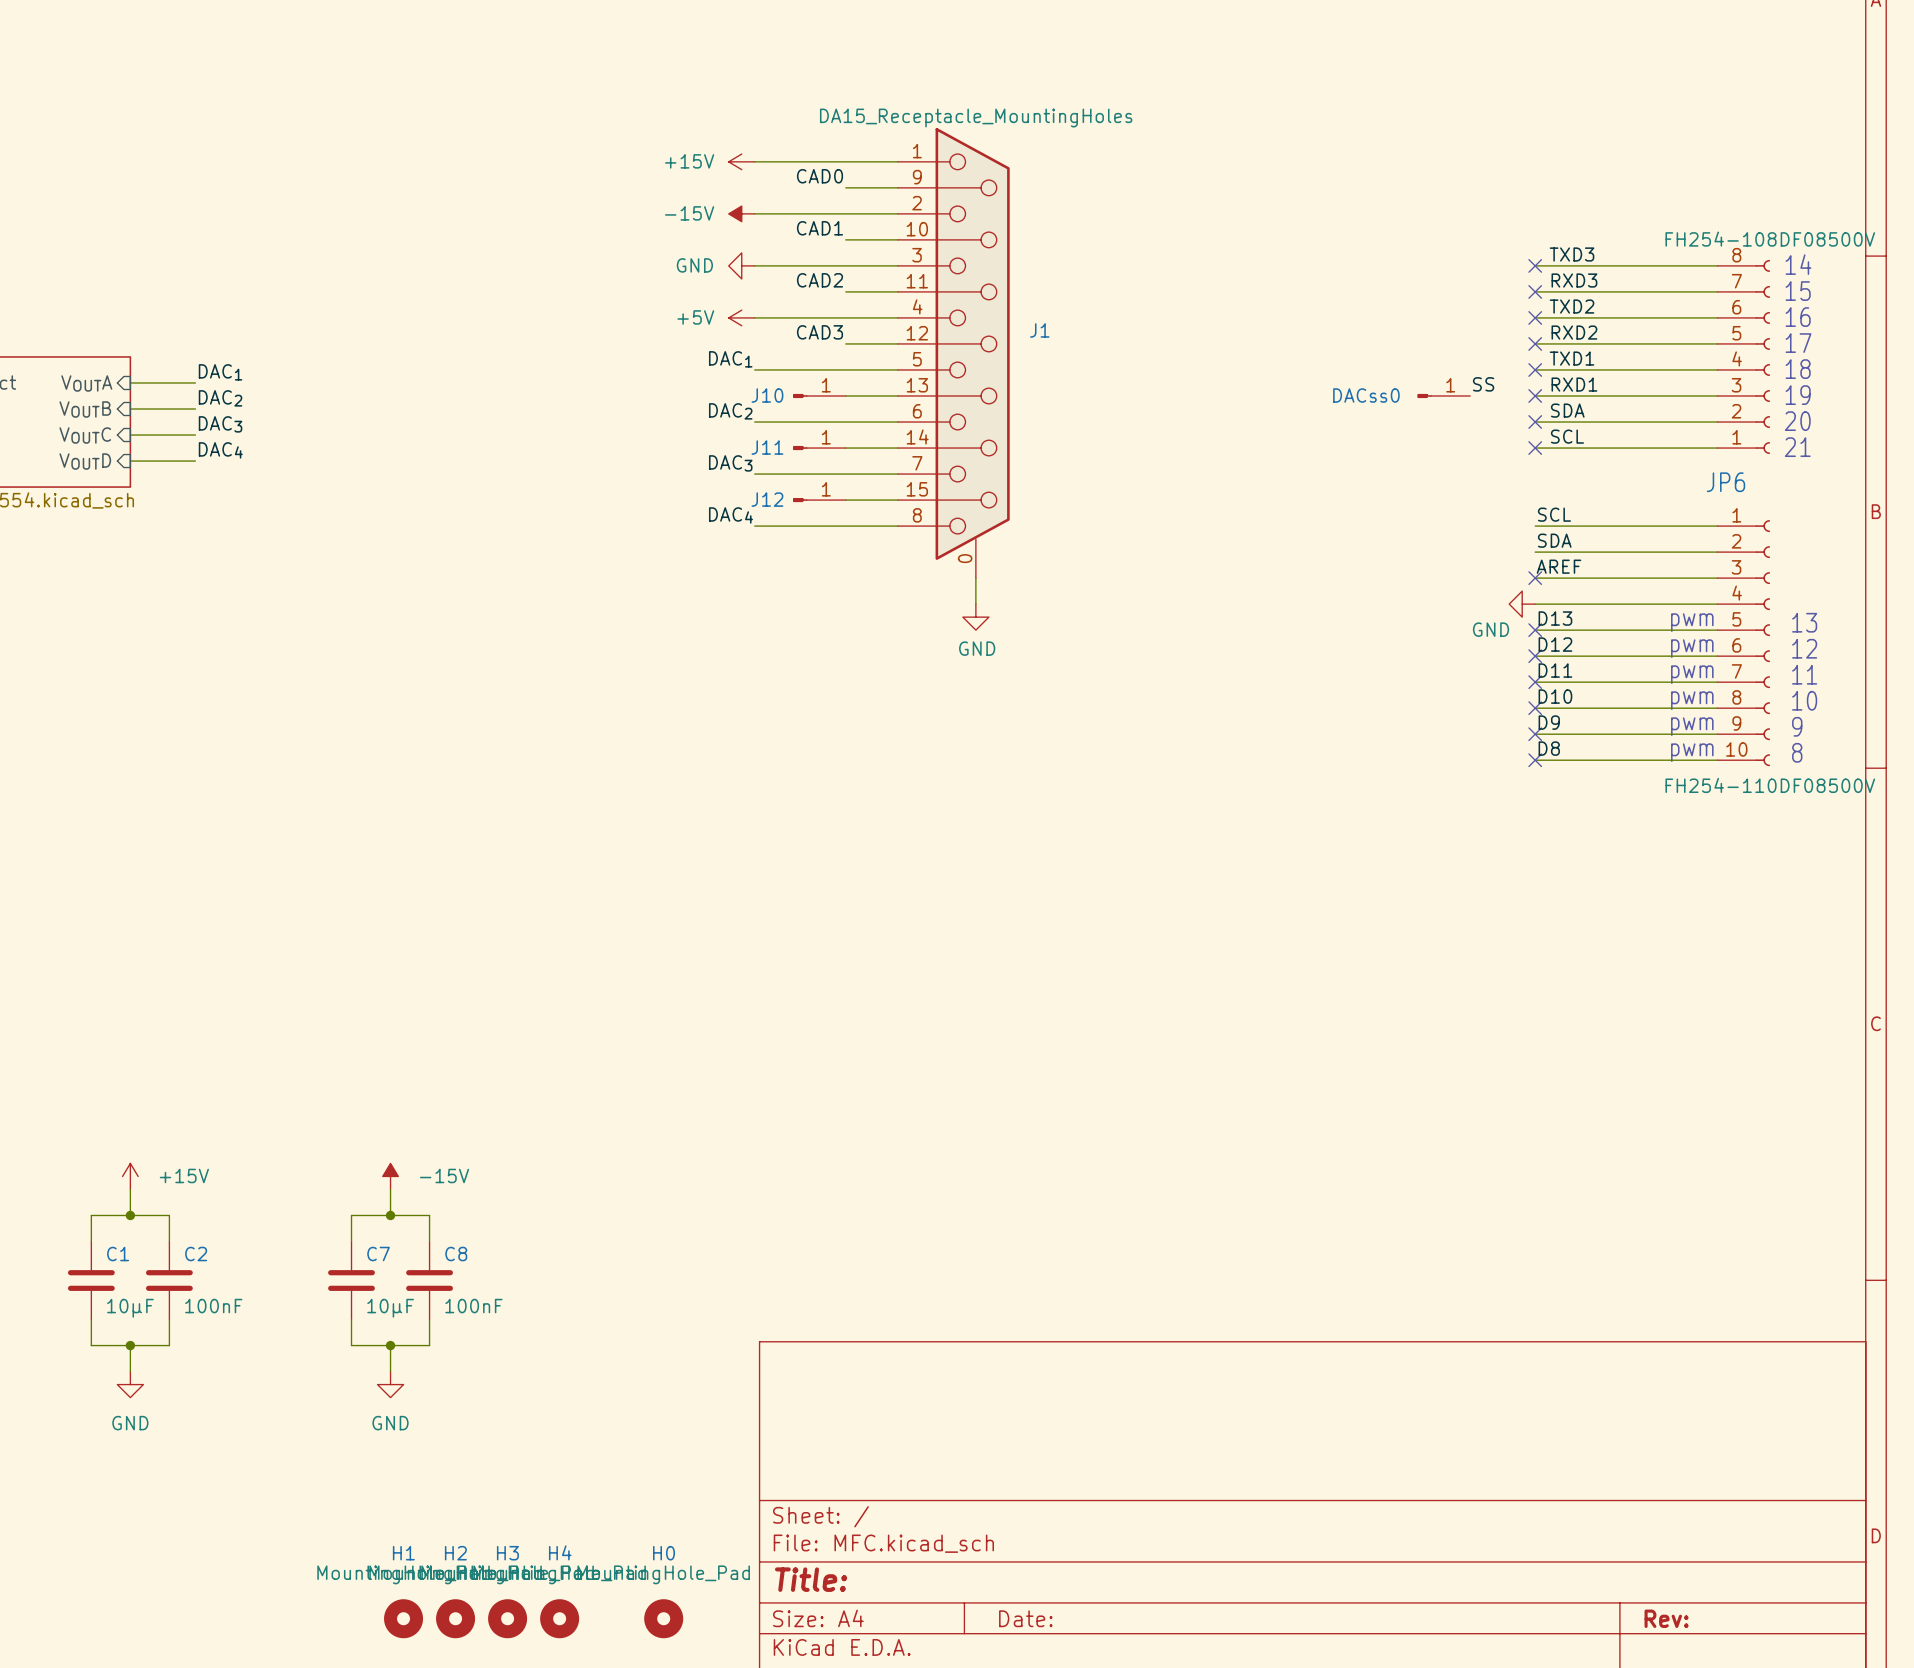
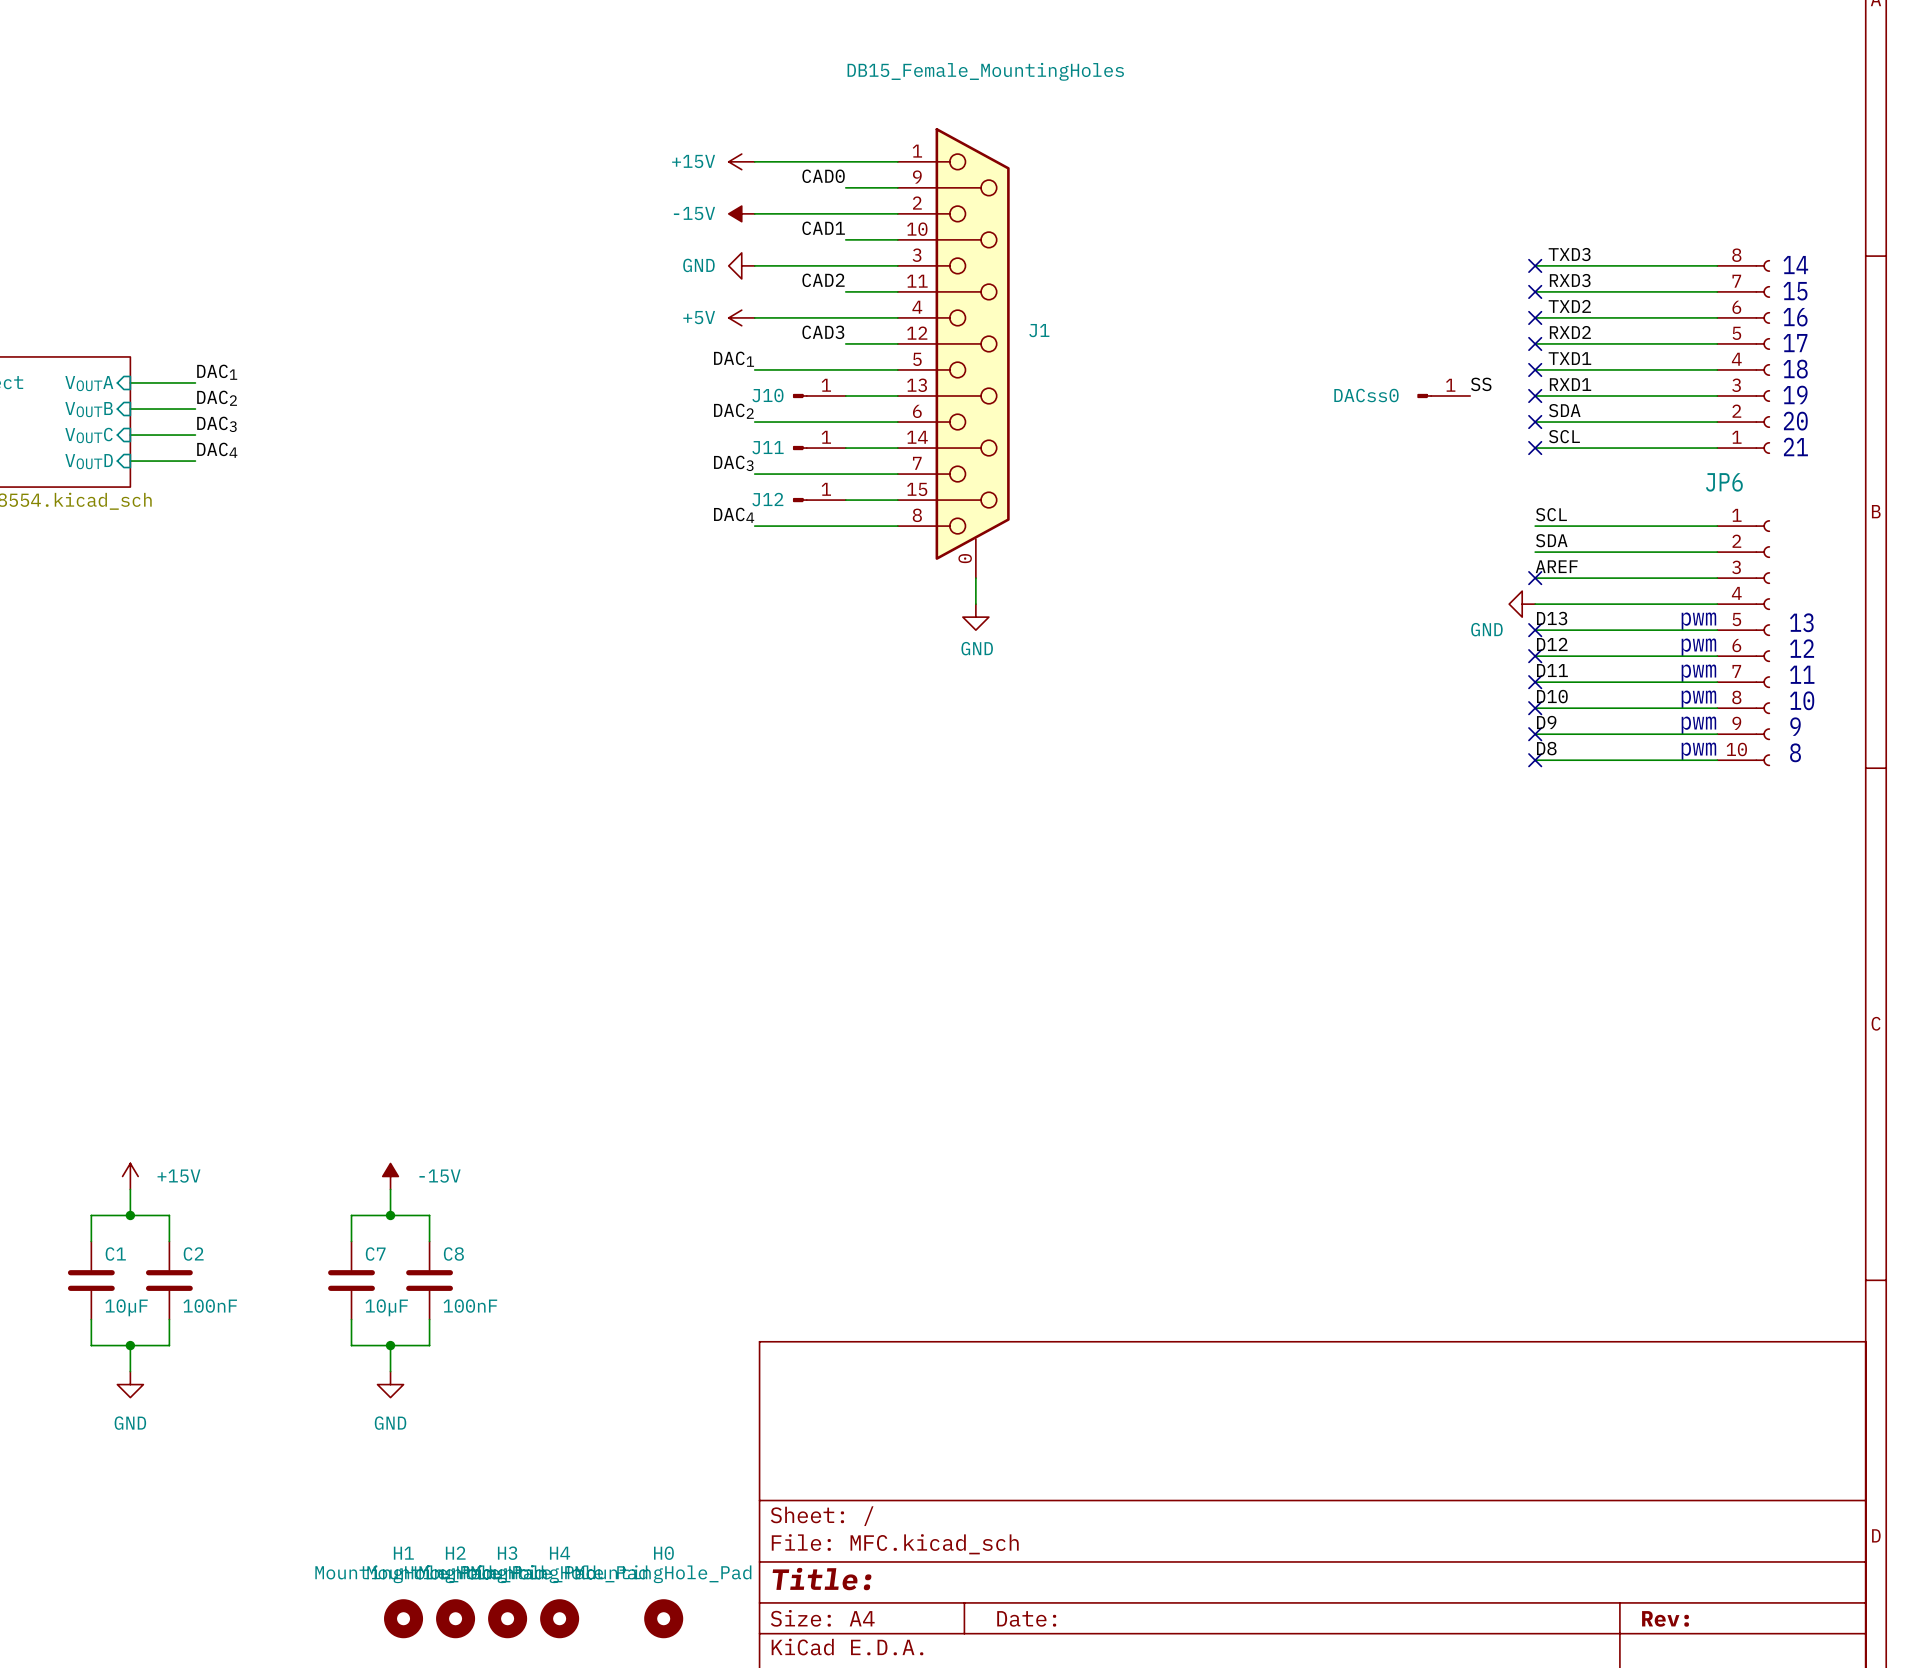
J1 value: DA15_Receptacle_MountingHoles (976, 118) -> DB15_Female_MountingHoles (985, 71)
part value: FH254-108DF08500V (1770, 239) -> none
JP6 value: FH254-110DF08500V (1770, 785) -> none

